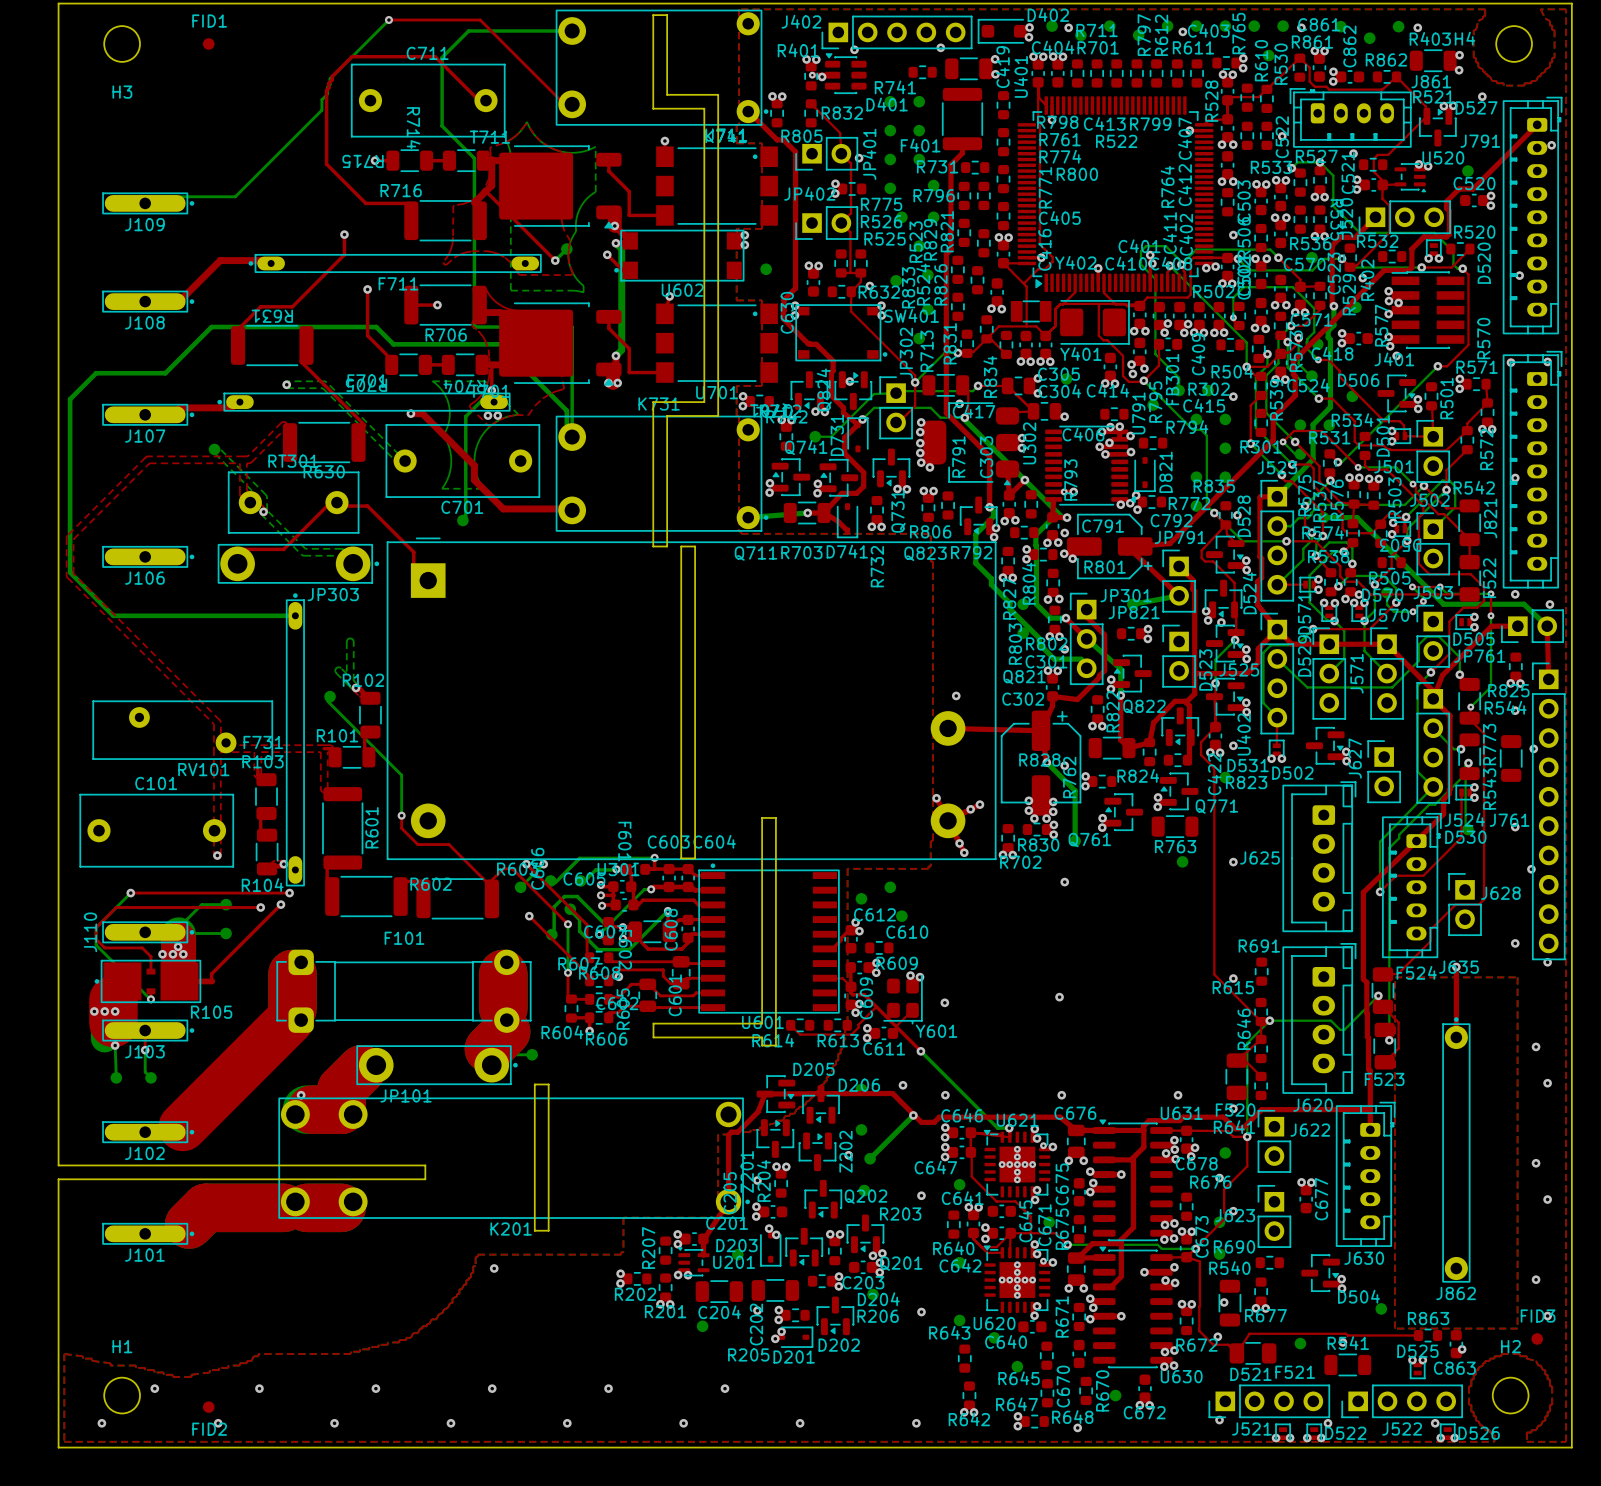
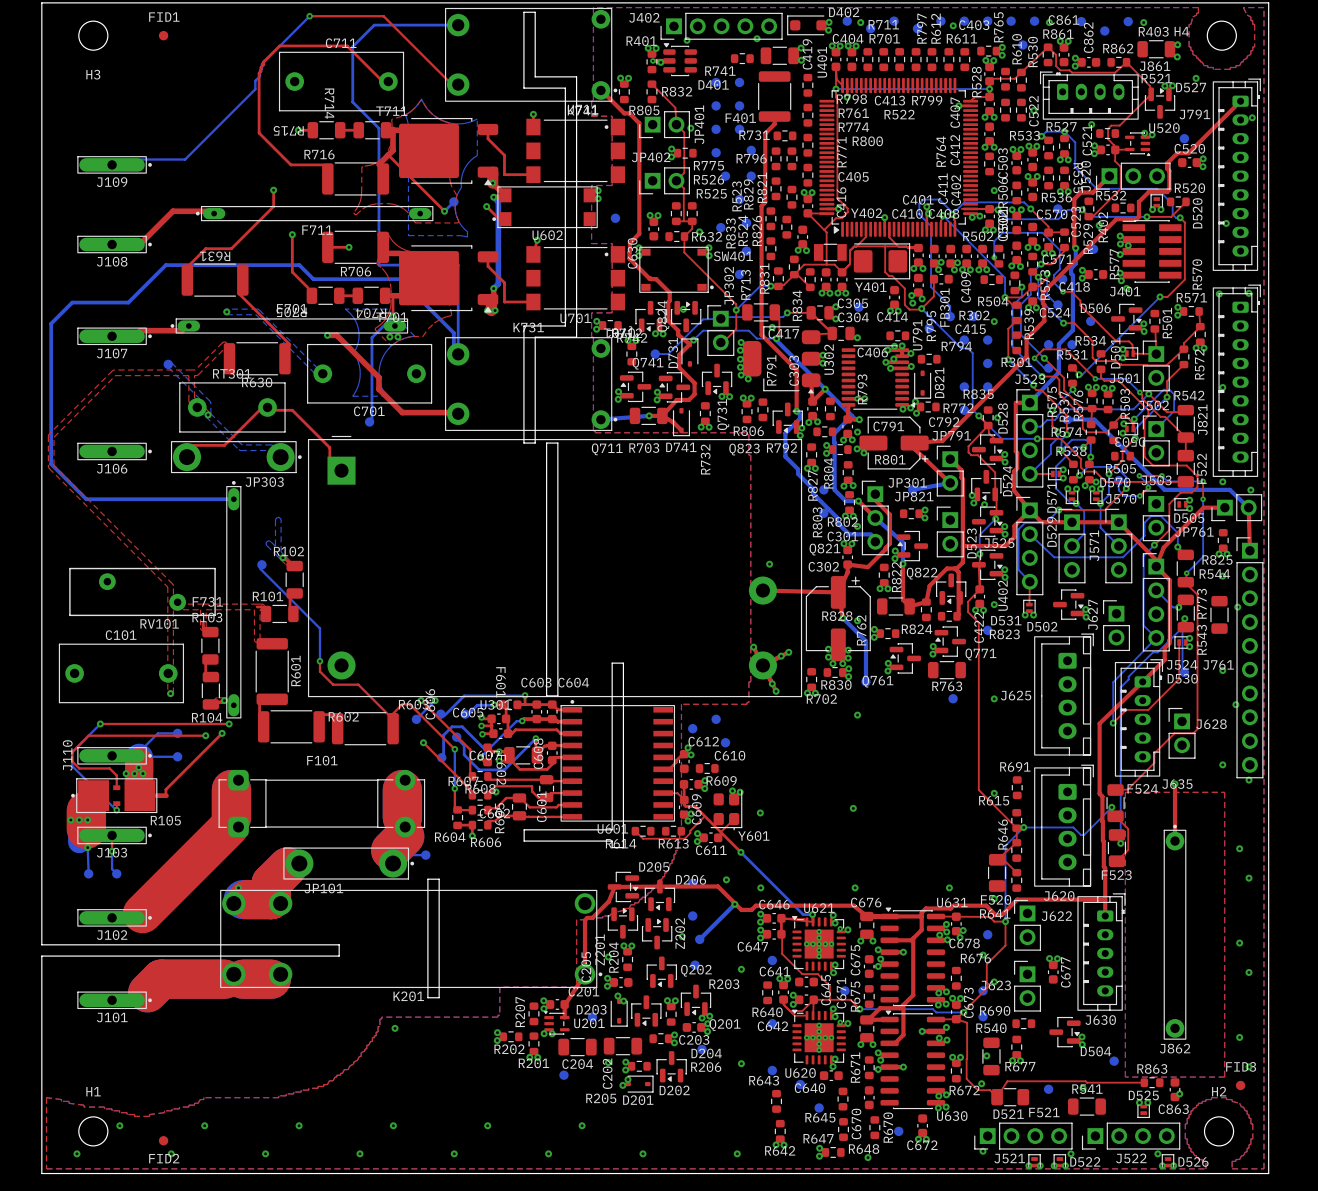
bottom track: none -> (836, 89) (989, 89)
via: none -> (836, 89)
via: none -> (989, 89)
top track: (1193, 257) (1190, 260) (1190, 294) (1187, 297) (1147, 297) (1139, 305) -> none

